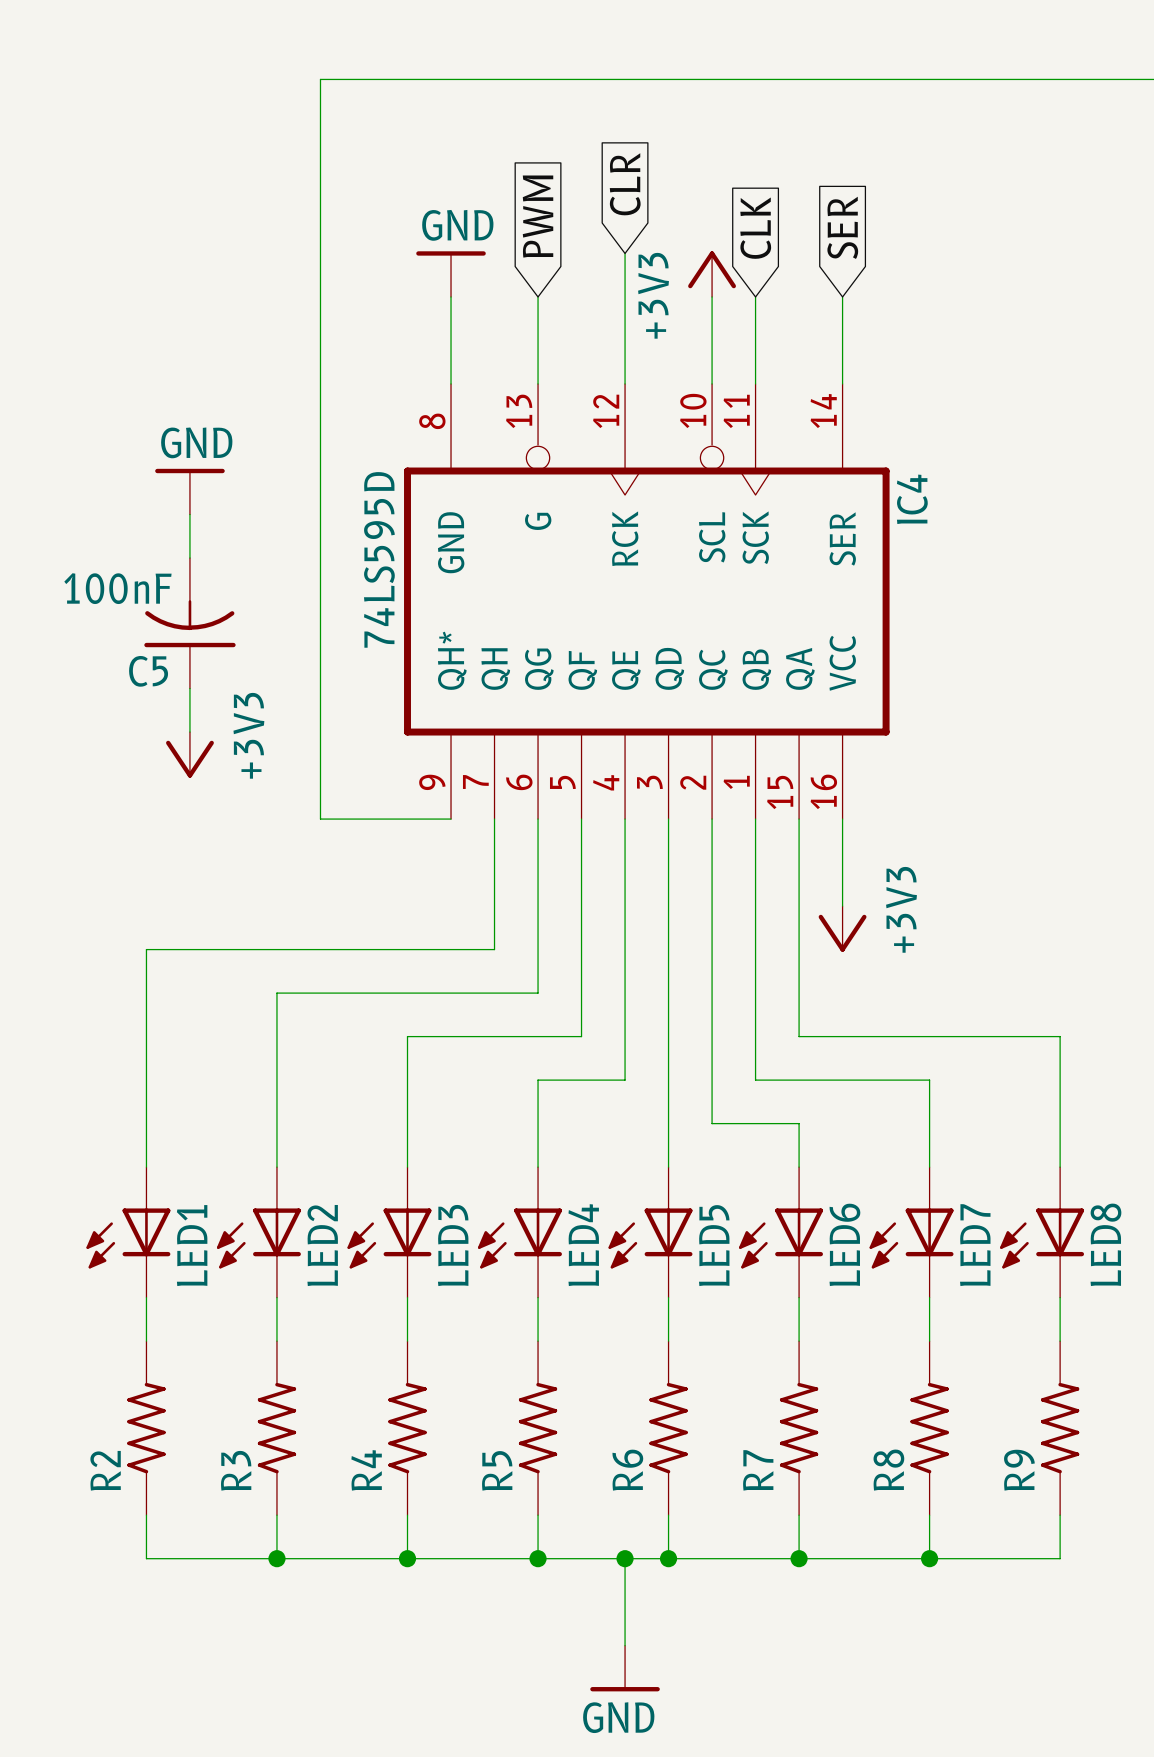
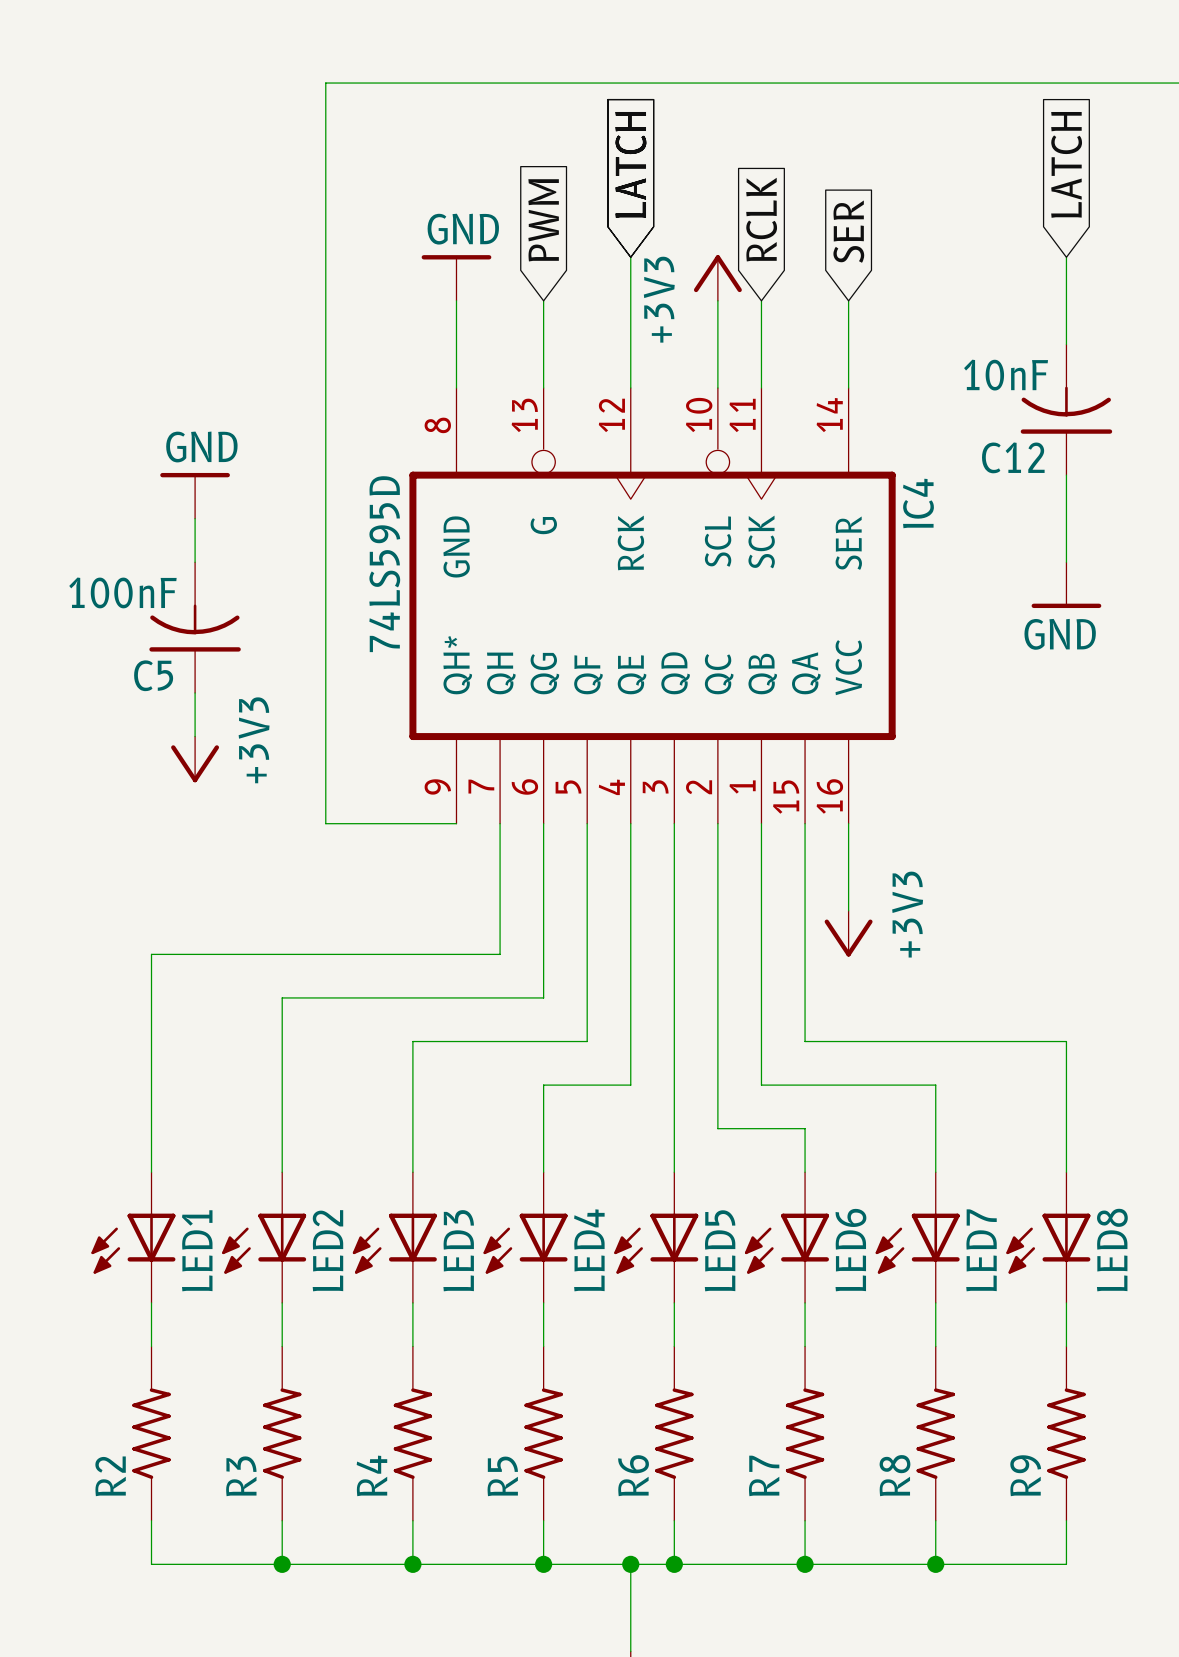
global label: none -> LATCH (1066, 164)
global label: CLR (625, 184) -> LATCH (630, 164)
global label: CLK (755, 228) -> RCLK (761, 219)
wire: none -> (1066, 257) (1066, 344)
C12: none -> 10nF (1066, 409)
wire: none -> (1066, 475) (1066, 562)
power symbol: none -> GND (1066, 585)

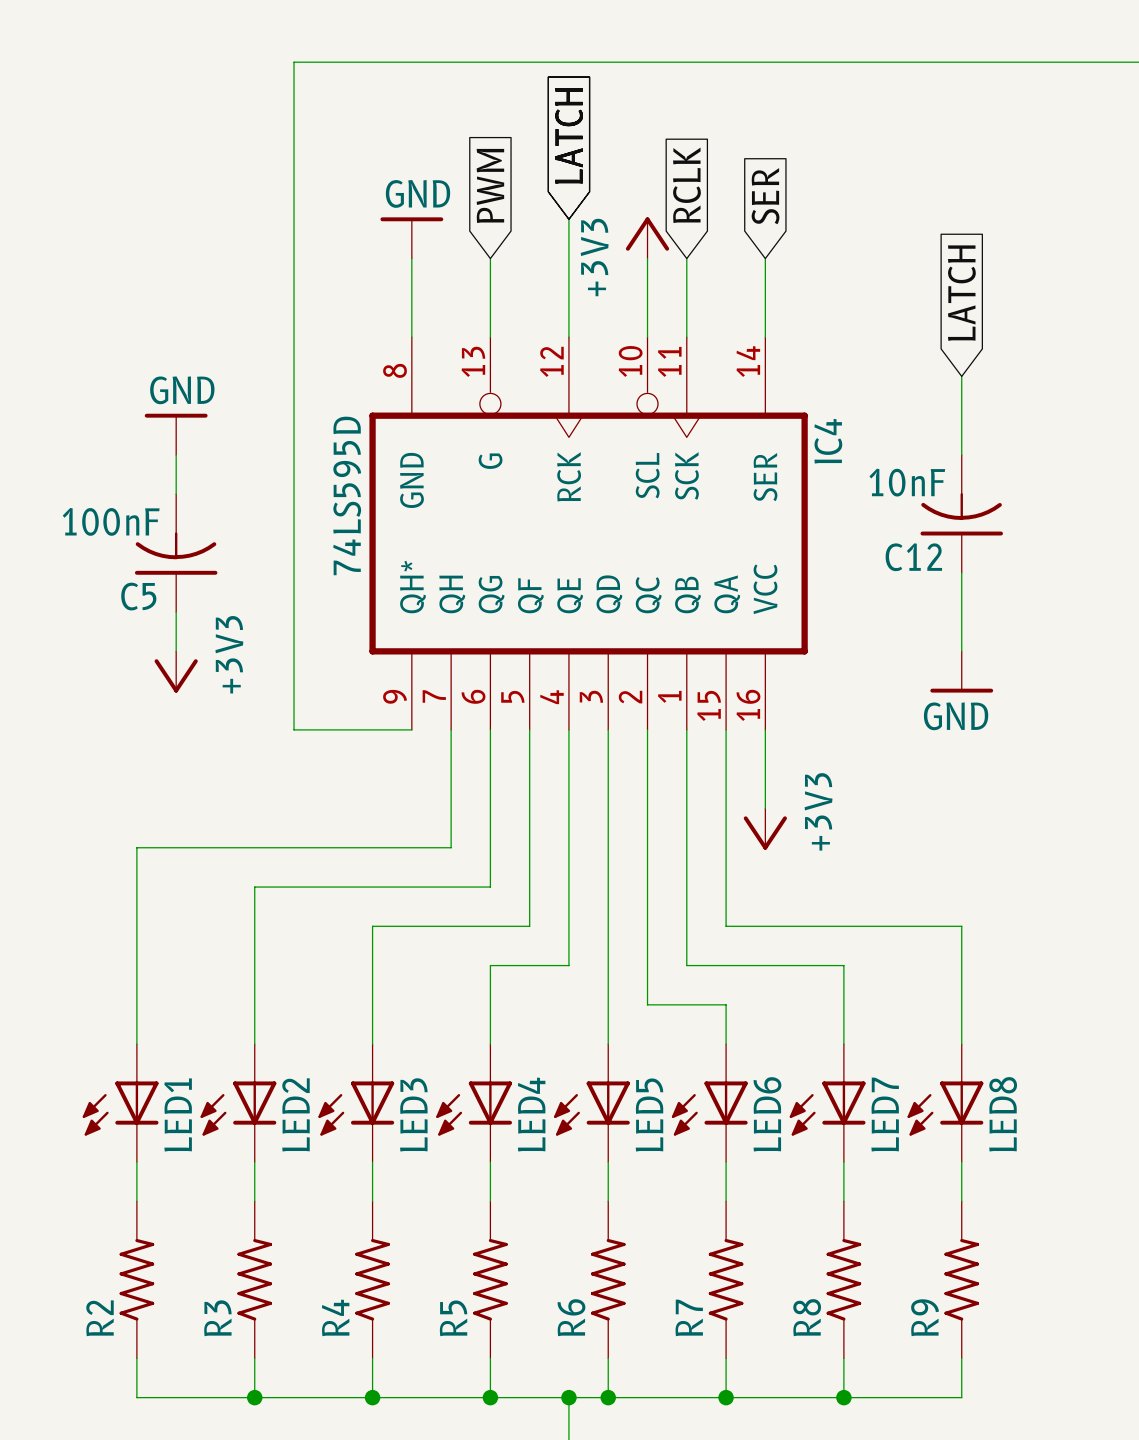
global label position: LATCH (1066, 164) -> LATCH (961, 293)
wire: (1066, 257) (1066, 344) -> (961, 572) (961, 651)
C12 position: (1066, 409) -> (961, 513)
power symbol position: GND (1066, 585) -> GND (961, 671)

